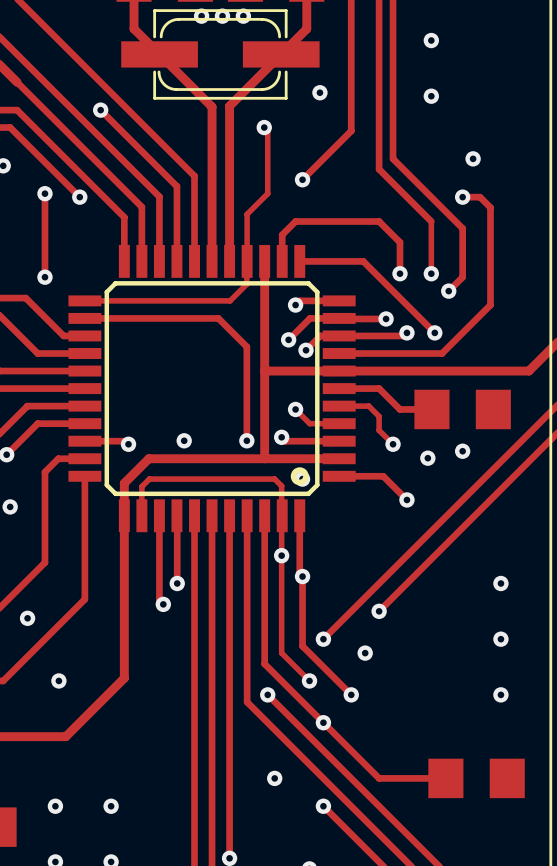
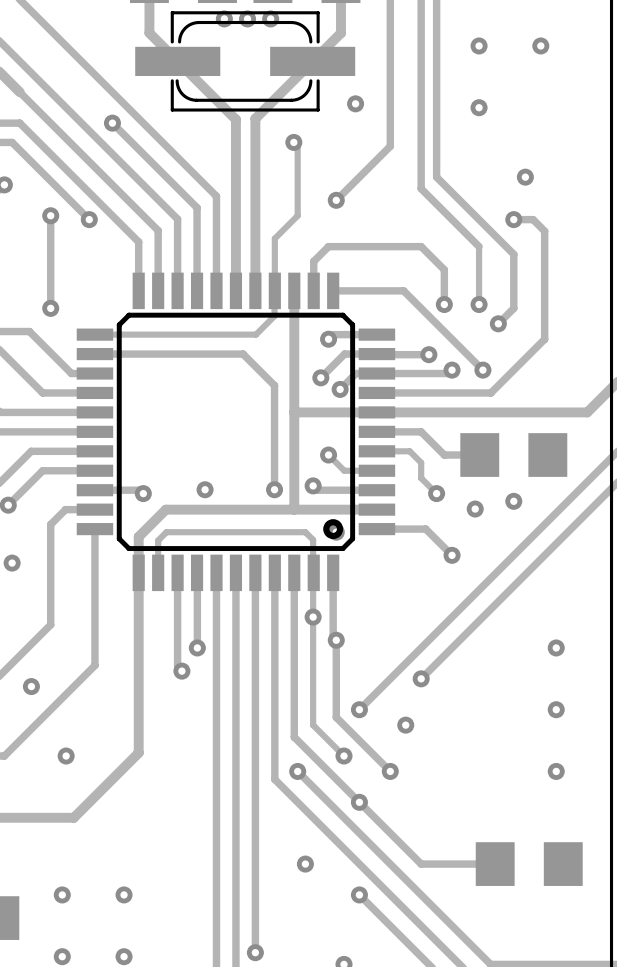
via: none -> (540, 45)

